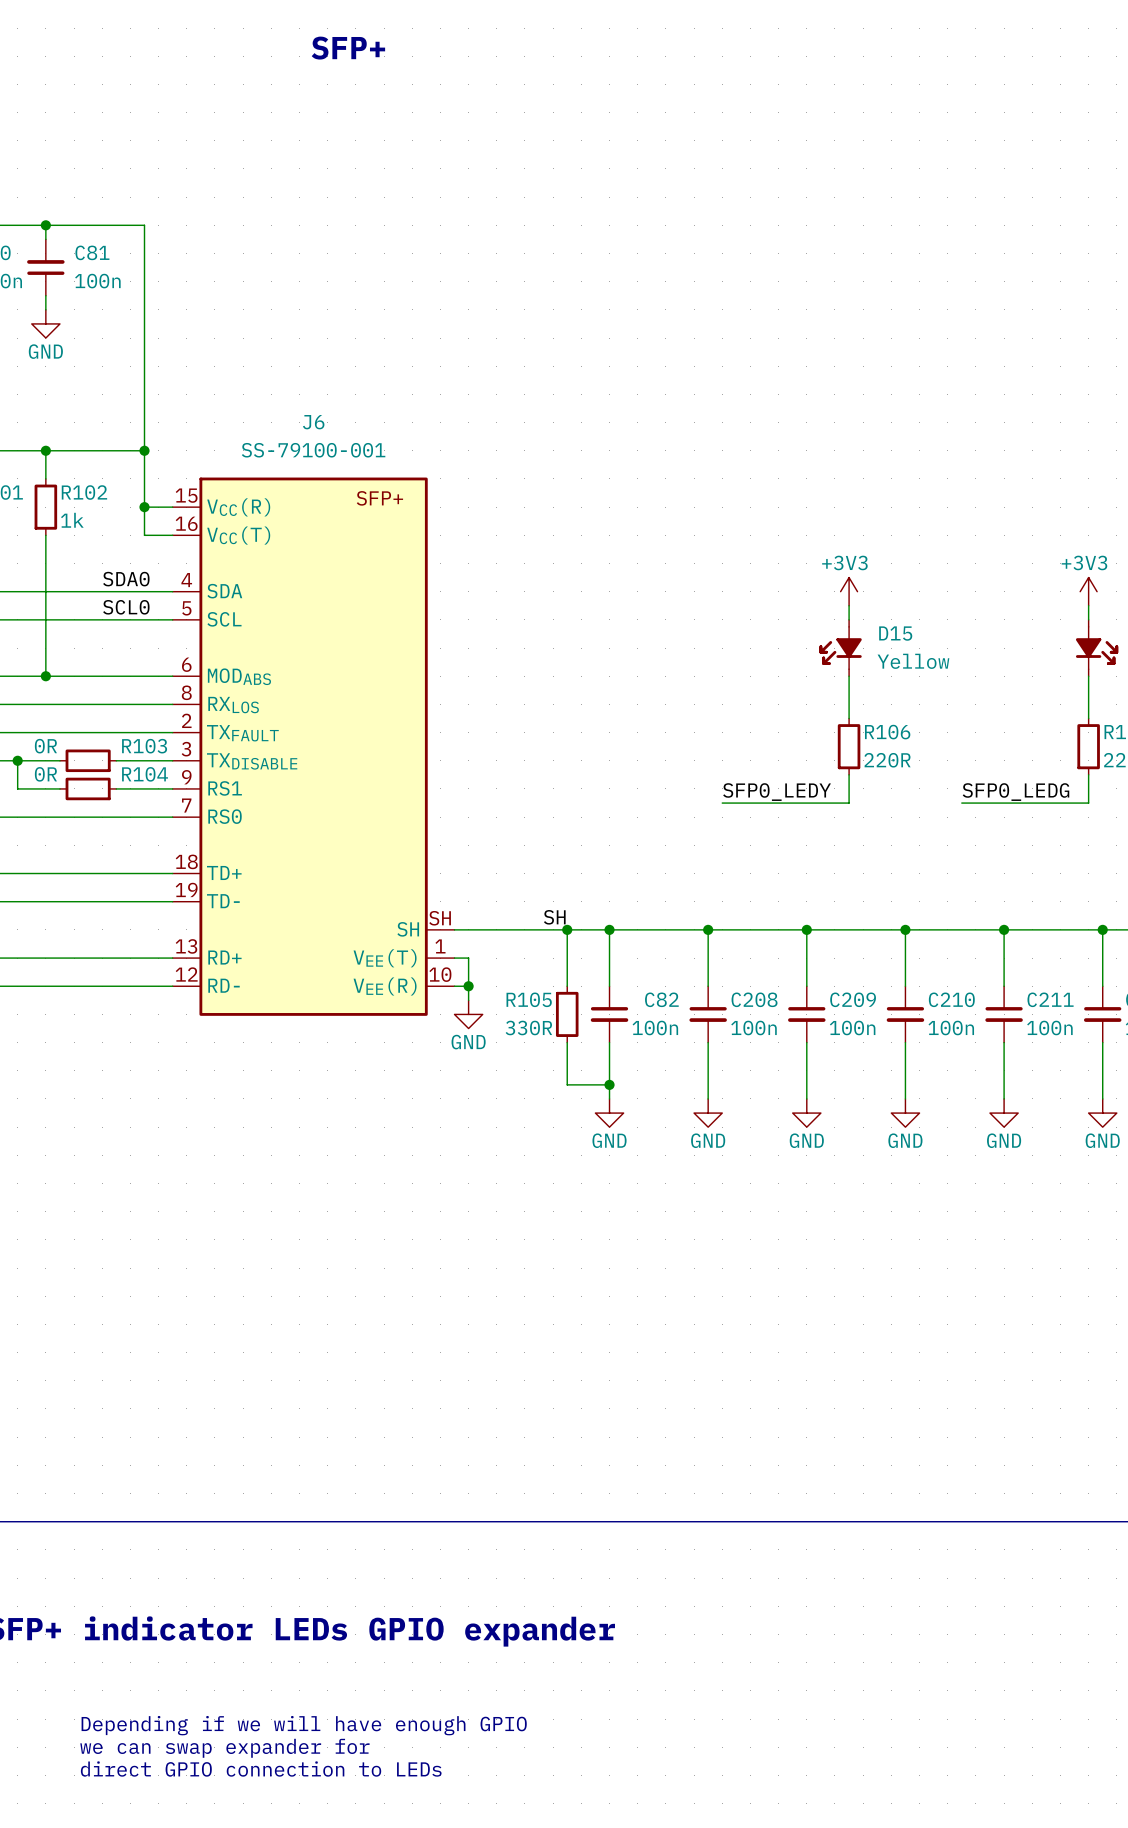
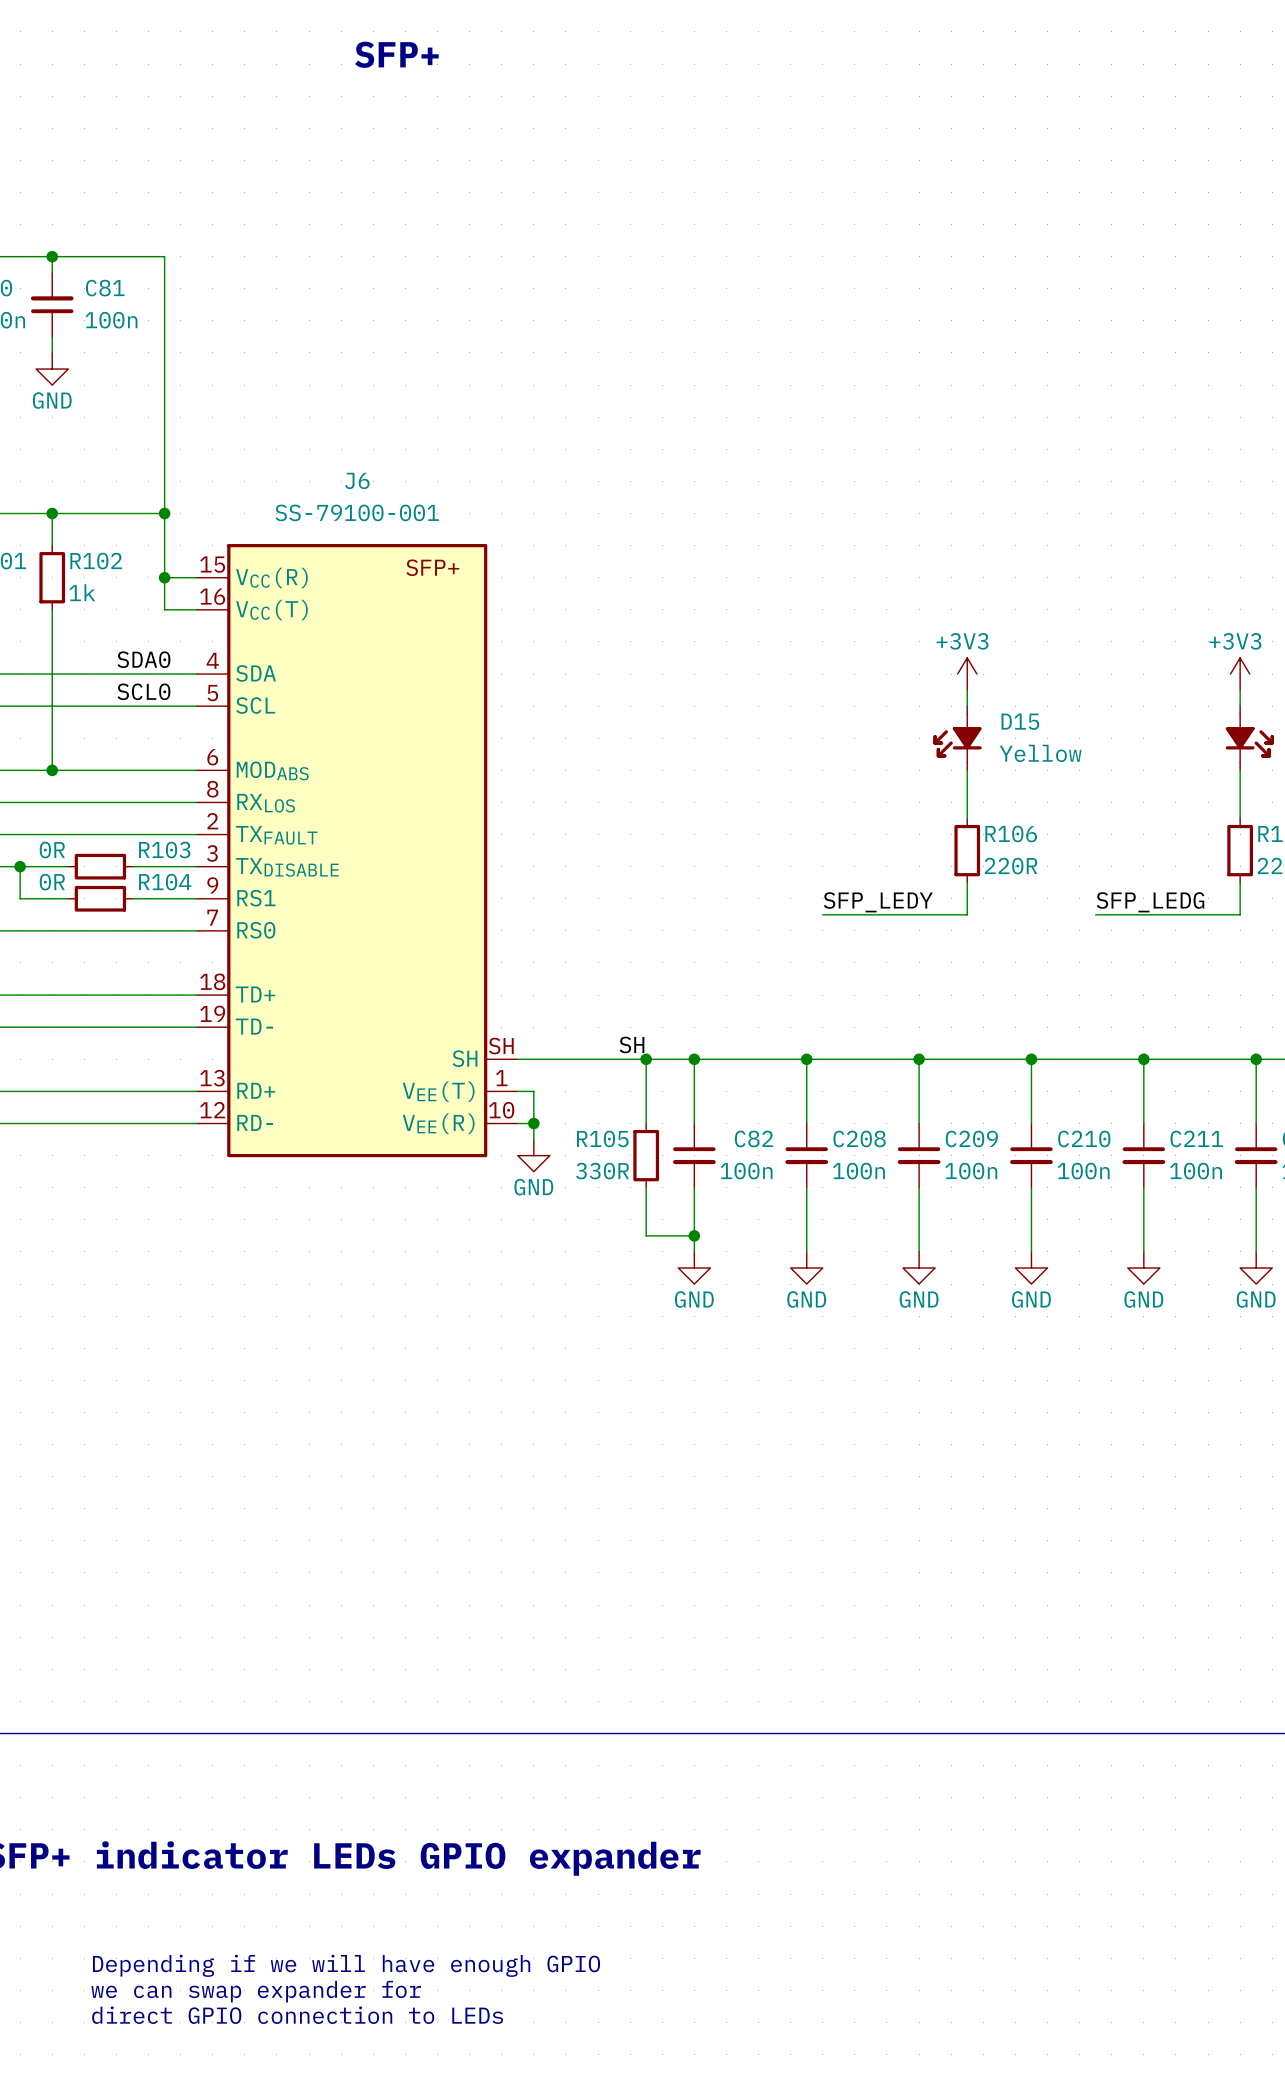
label: SFP0_LEDY (777, 792) -> SFP_LEDY (878, 902)
label: SFP0_LEDG (1015, 792) -> SFP_LEDG (1150, 902)

